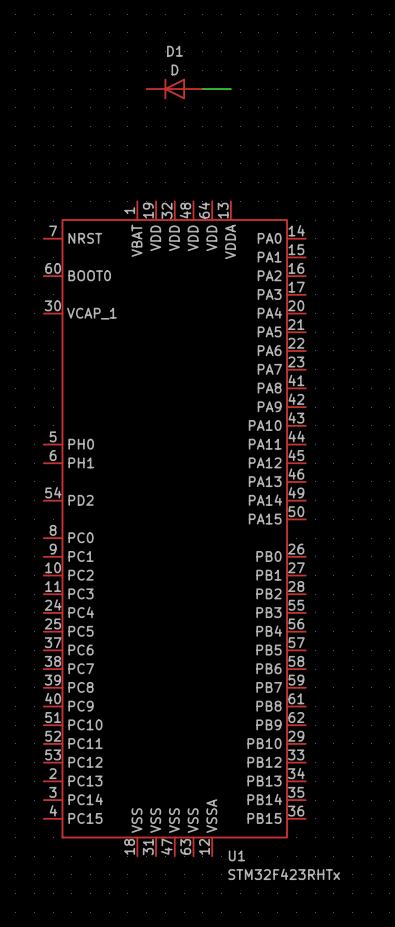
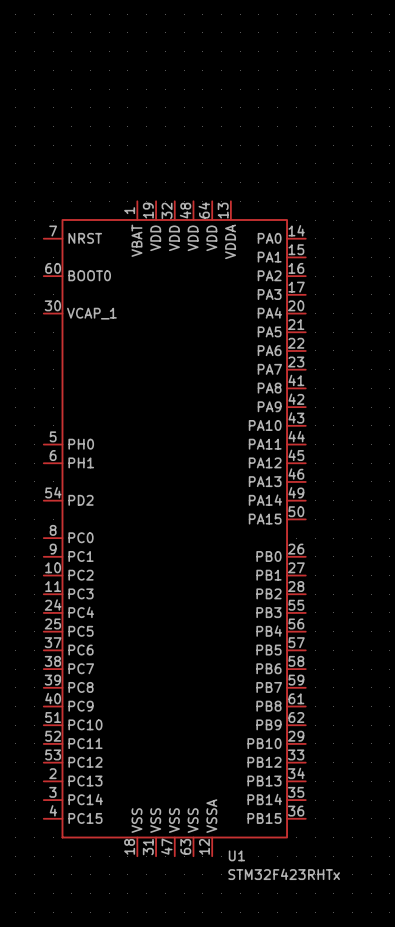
D1: D (174, 89) -> none
wire: (202, 89) (230, 89) -> none

